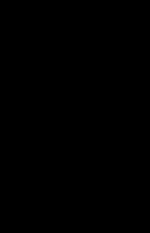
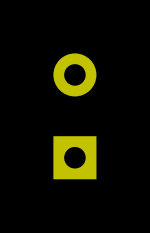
part: none -> (74, 116)

